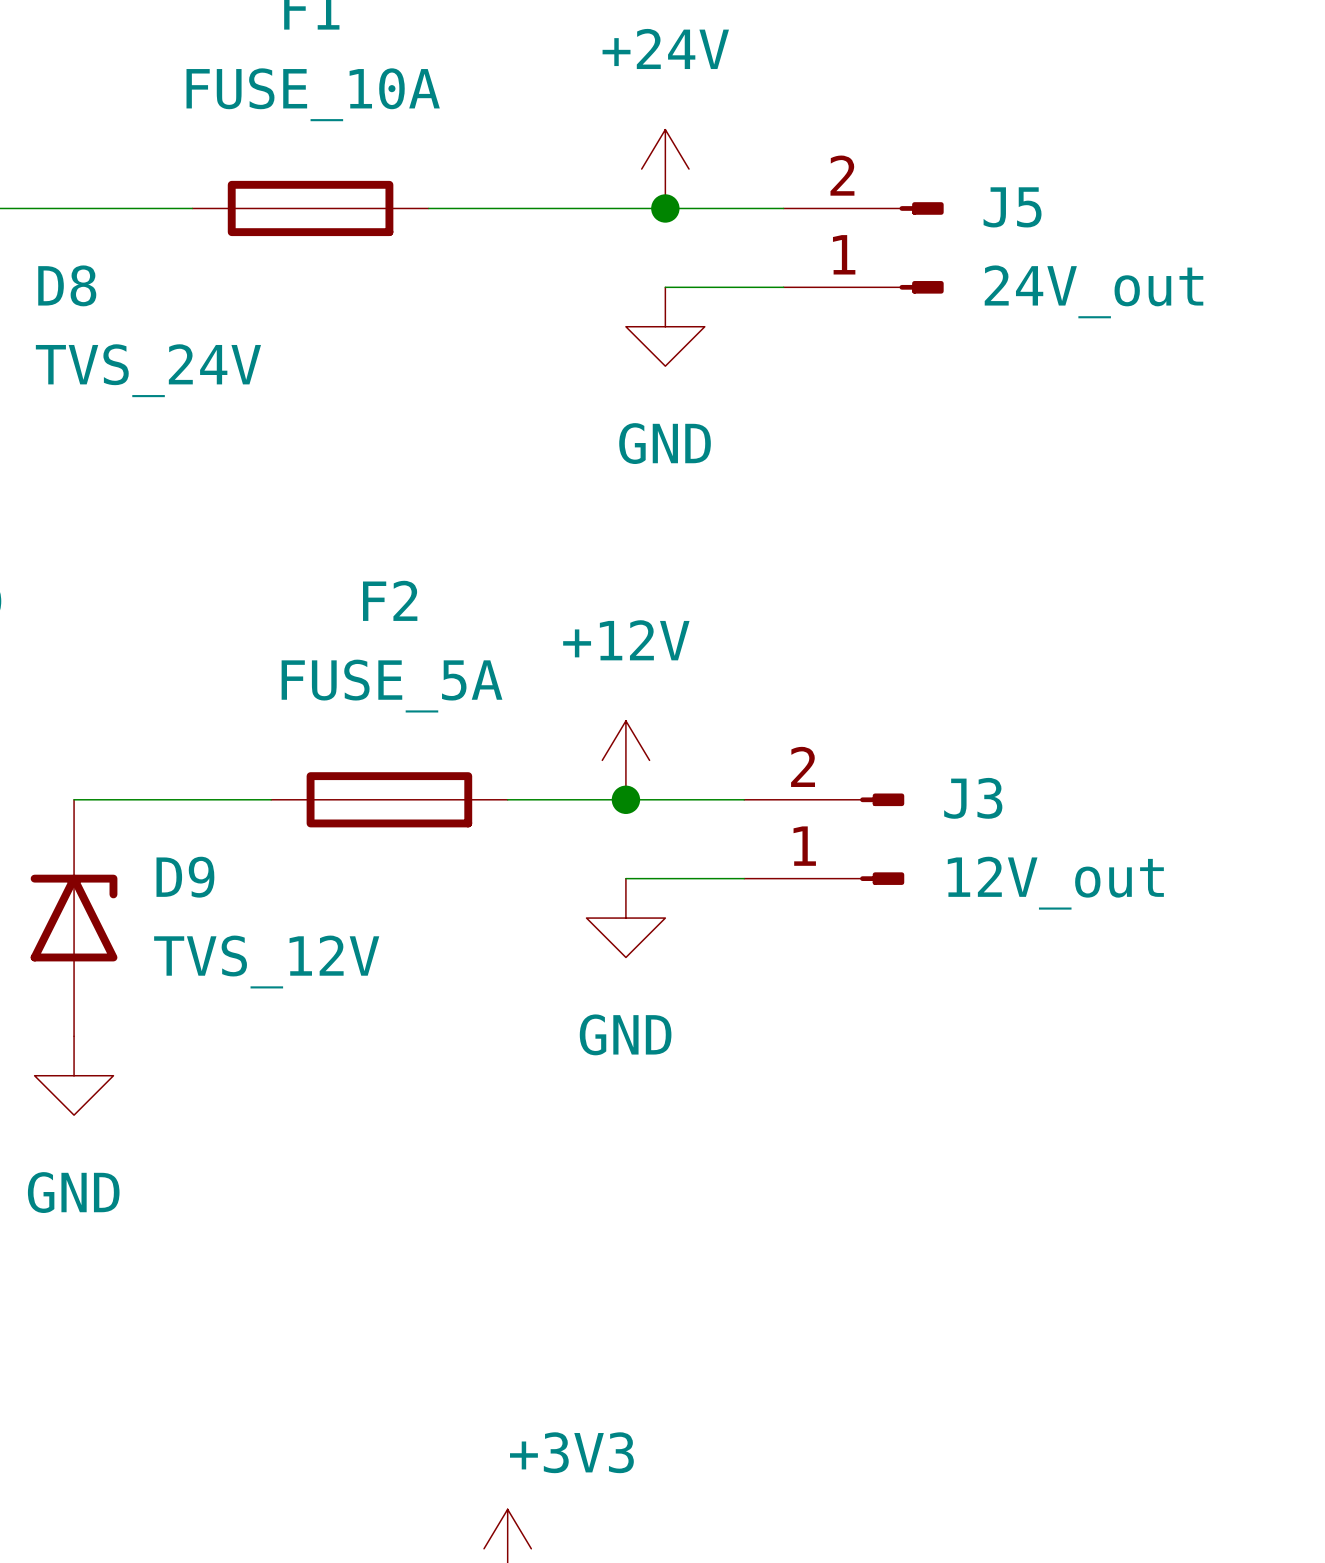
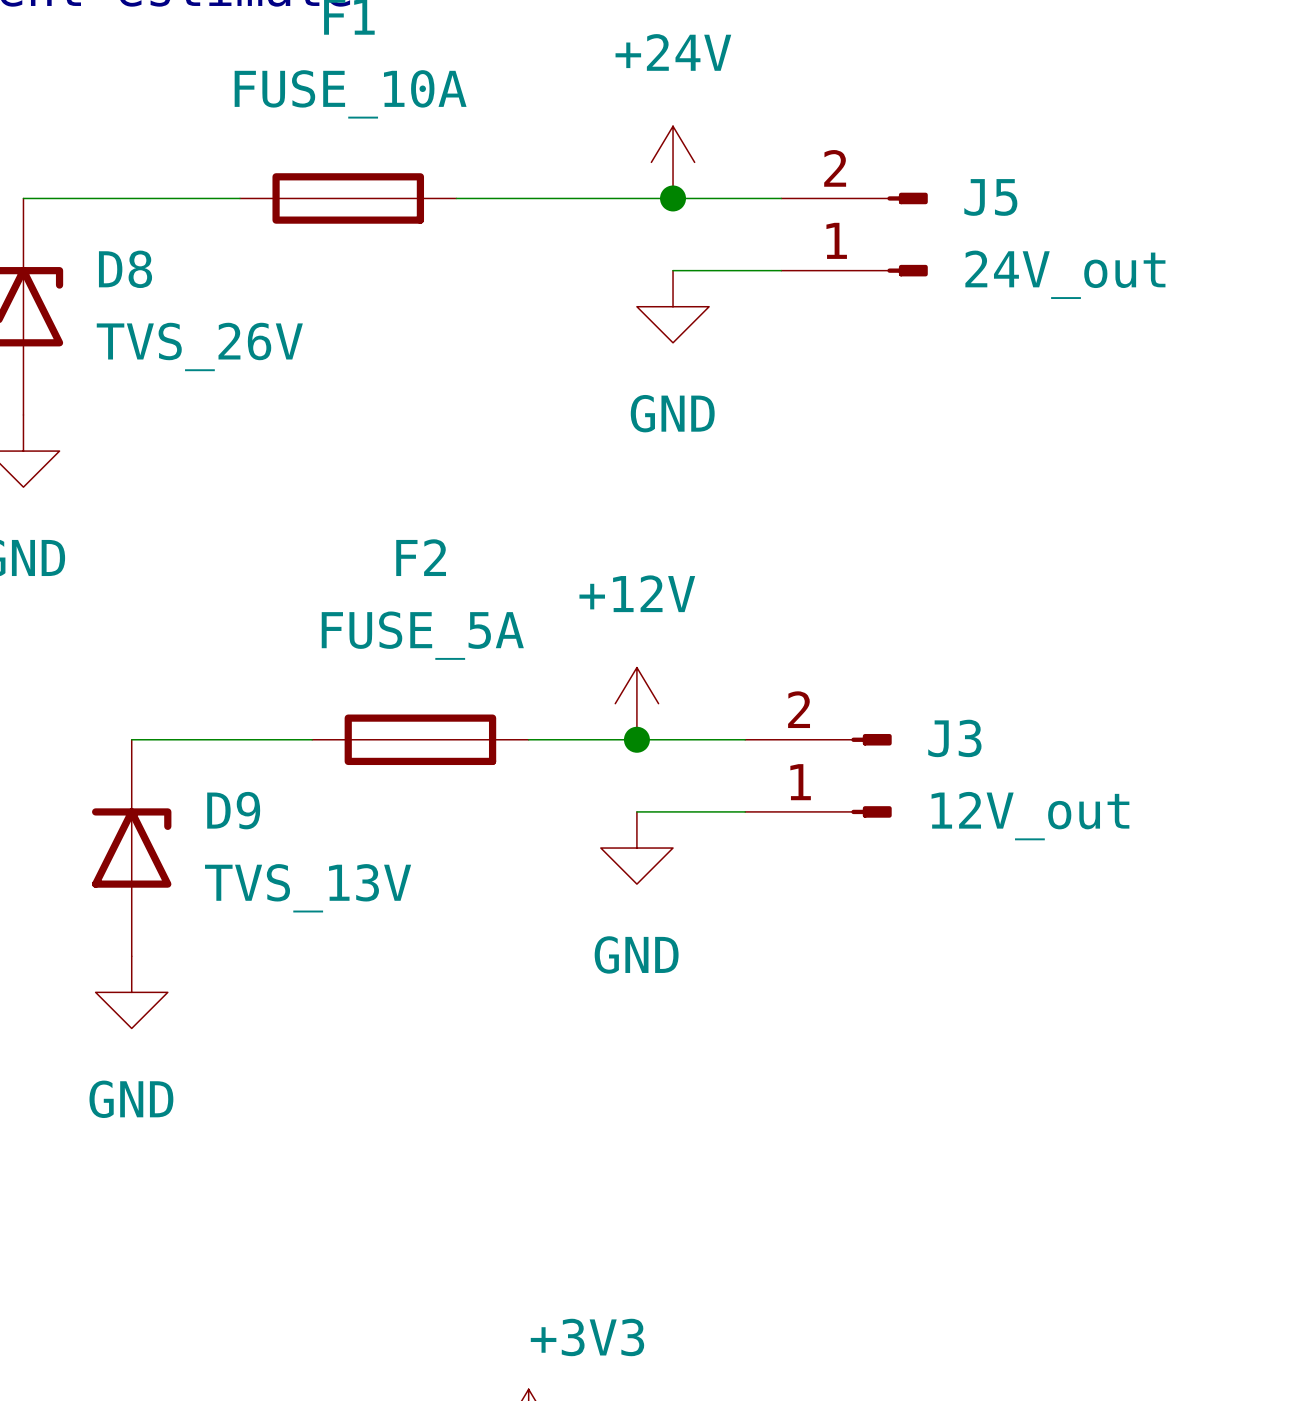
D8 value: TVS_24V (148, 370) -> TVS_26V (199, 346)
D9 value: TVS_12V (266, 962) -> TVS_13V (308, 888)

